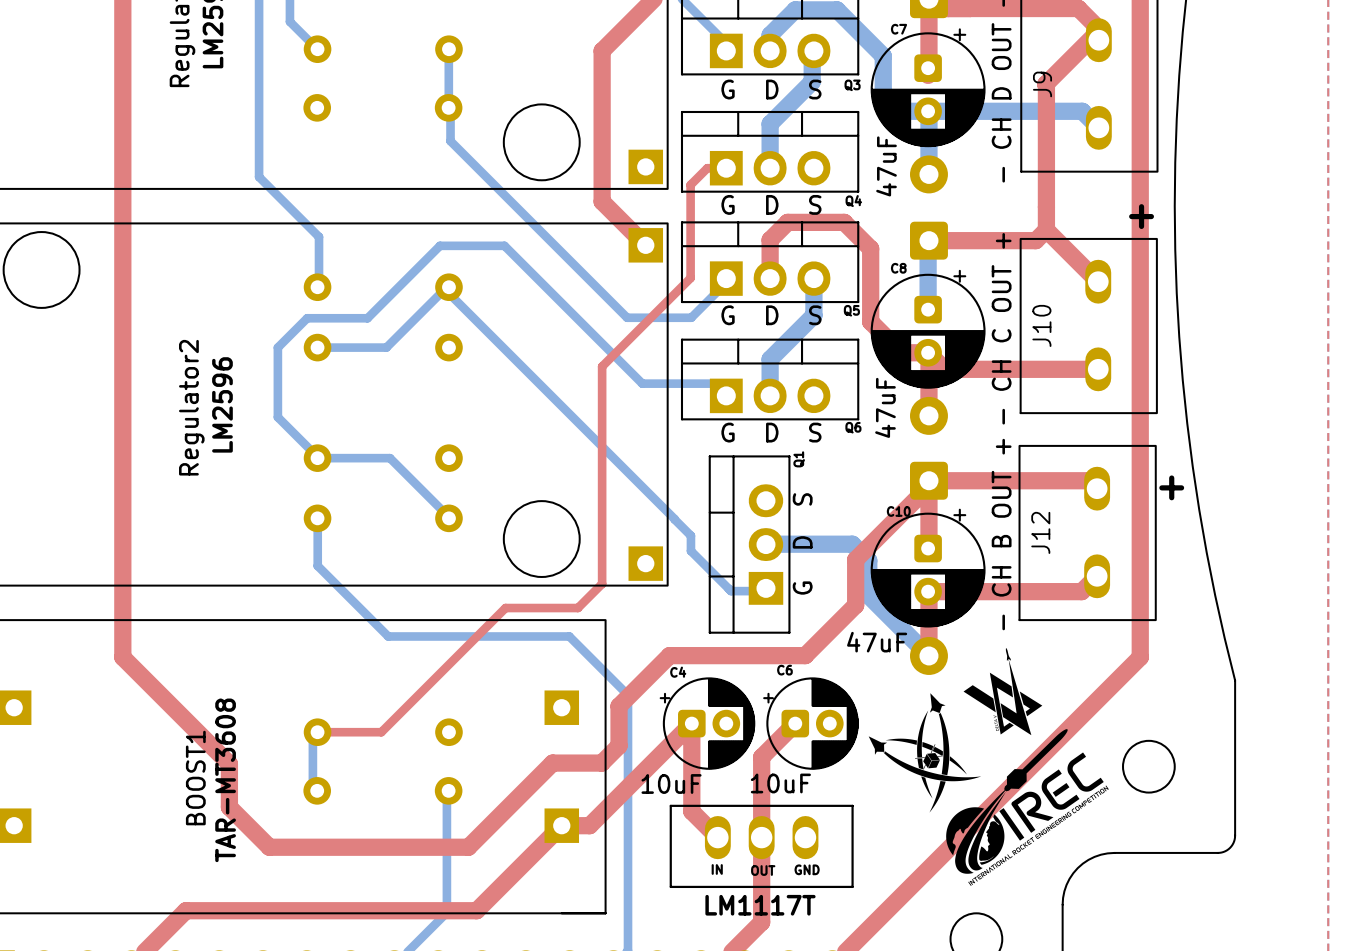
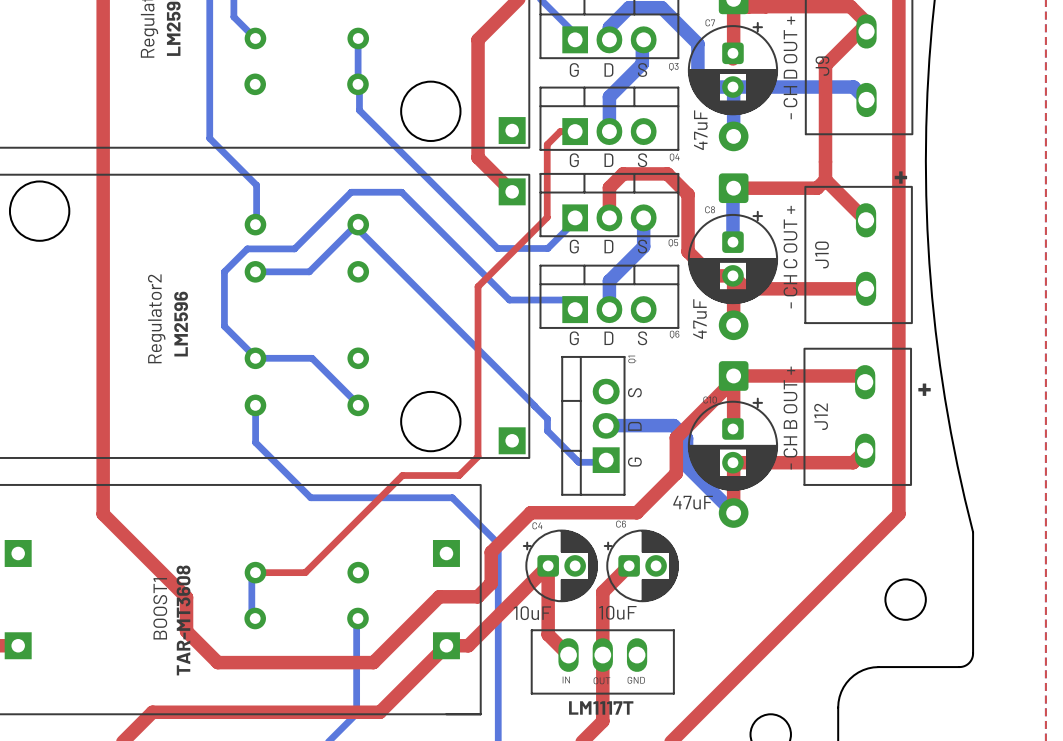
drawing: [868, 647, 1109, 886] -> none

